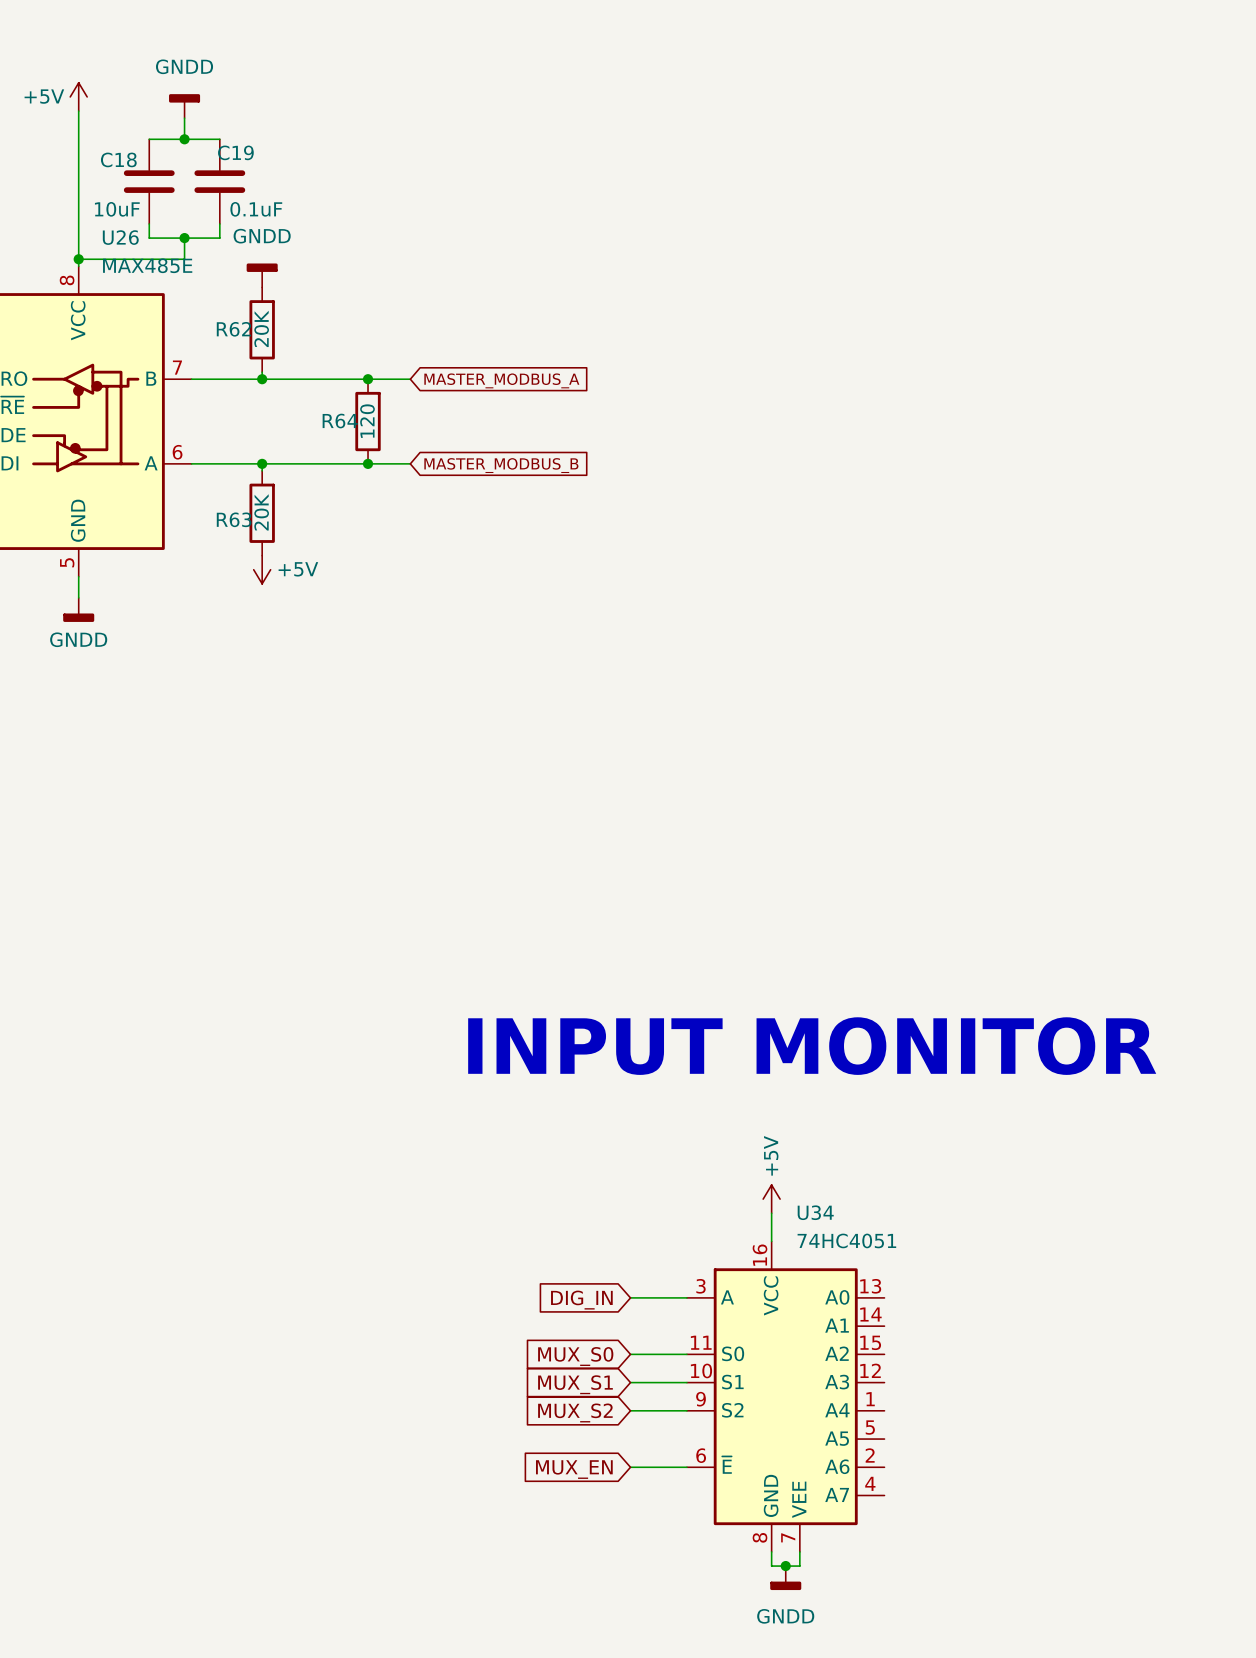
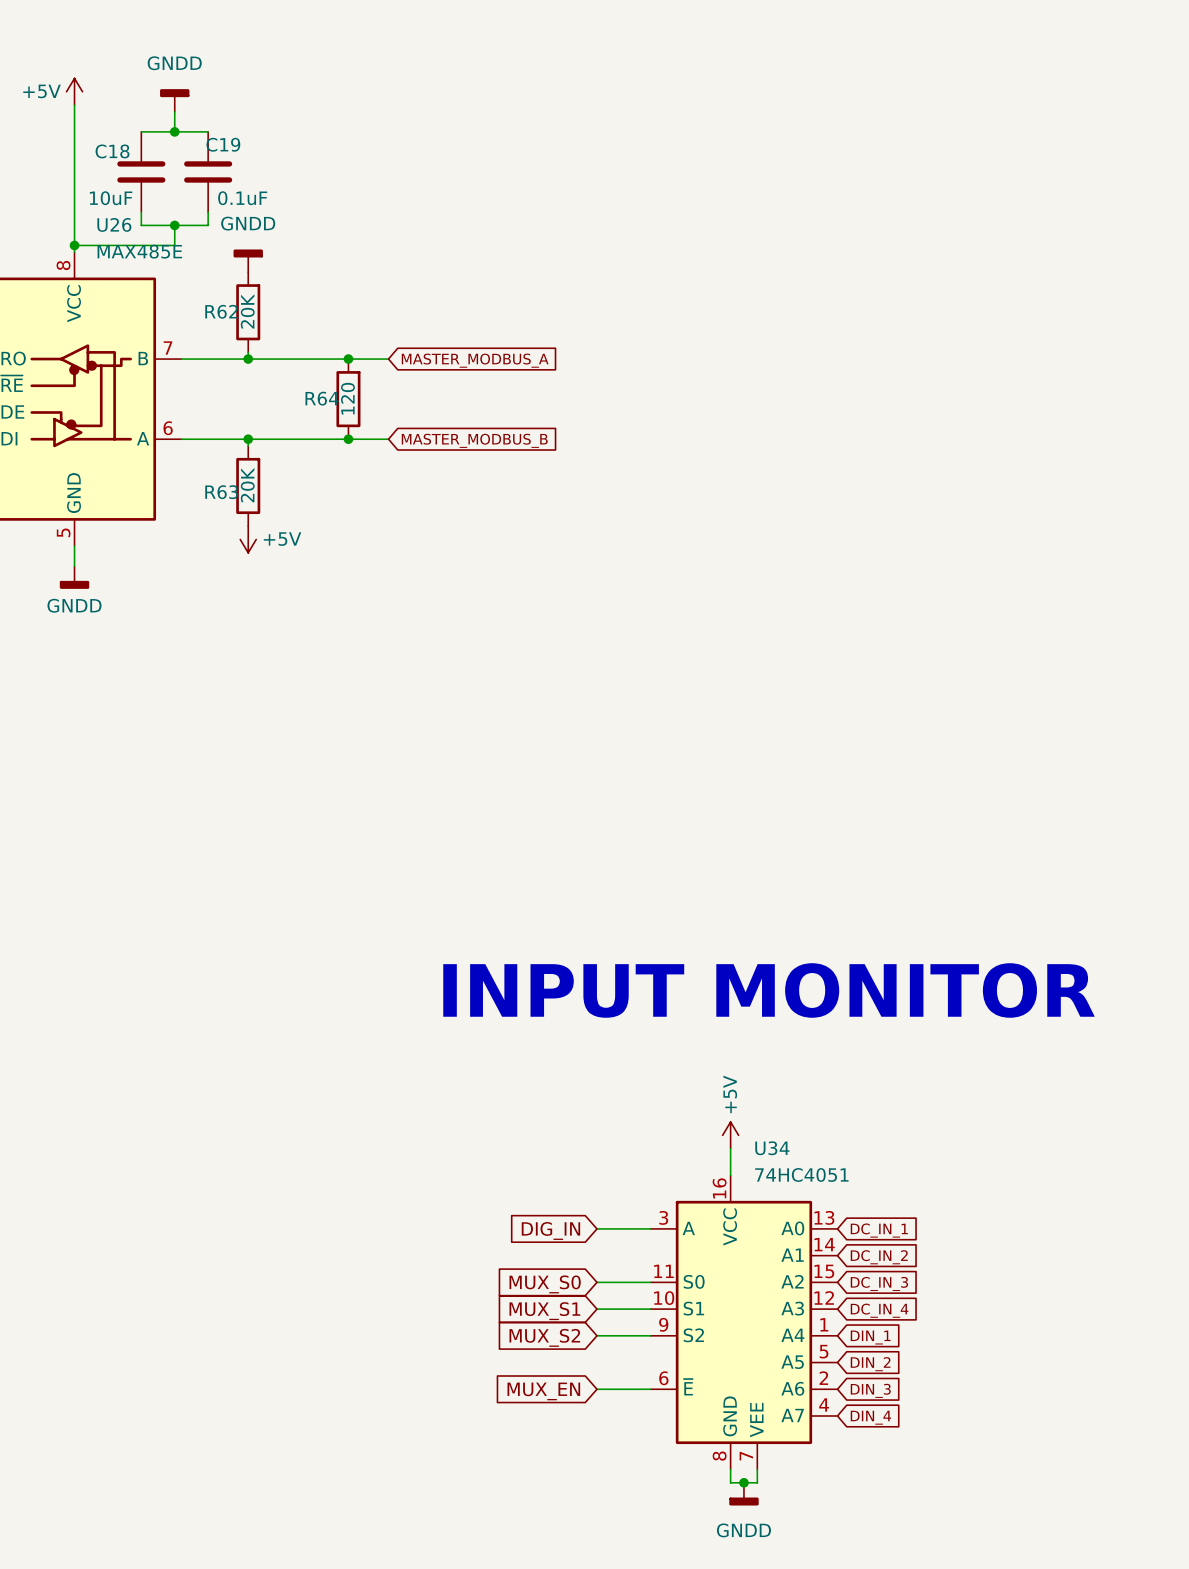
global label: none -> DC_IN_1 (879, 1230)
global label: none -> DC_IN_2 (879, 1257)
global label: none -> DC_IN_3 (879, 1283)
global label: none -> DC_IN_4 (879, 1310)
global label: none -> DIN_1 (870, 1337)
global label: none -> DIN_2 (870, 1364)
global label: none -> DIN_3 (870, 1390)
global label: none -> DIN_4 (870, 1417)

